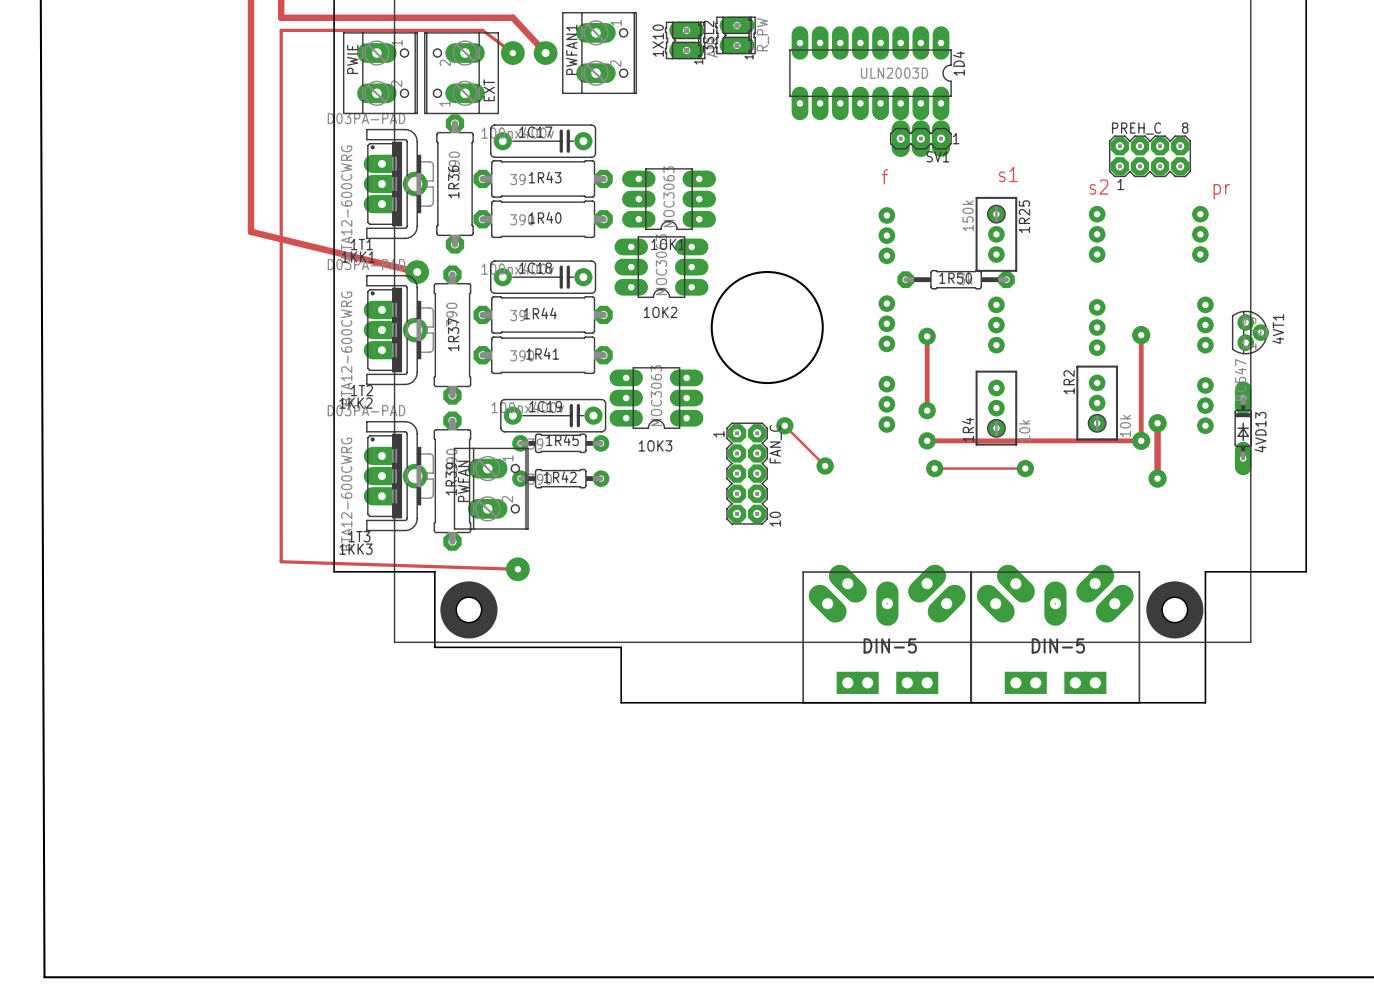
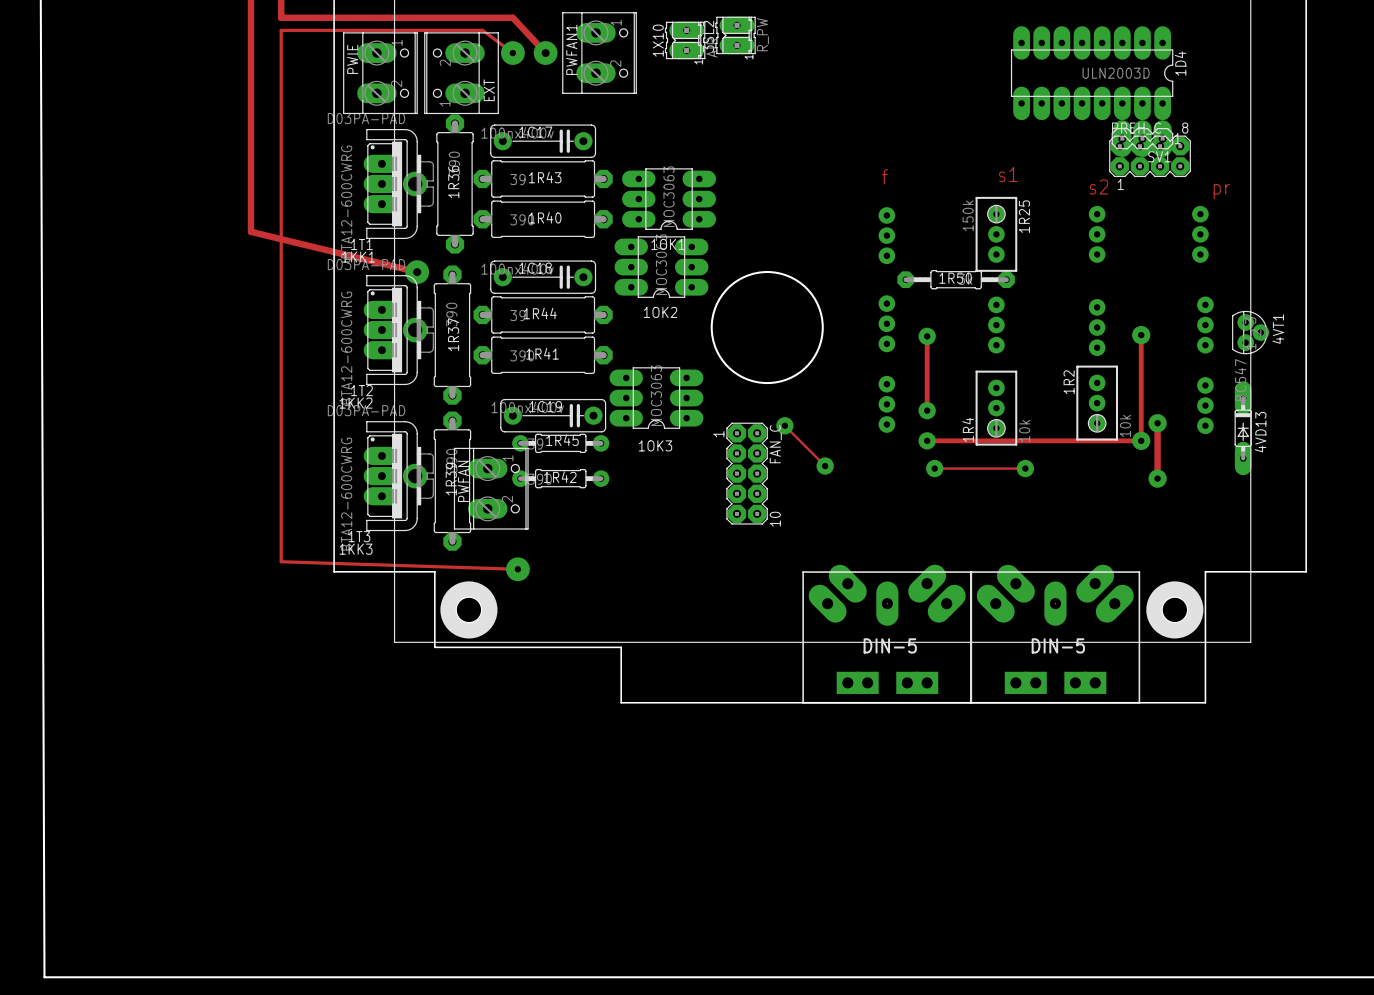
1D4 position: (870, 73) -> (1092, 73)
SV1 position: (920, 138) -> (1142, 138)

